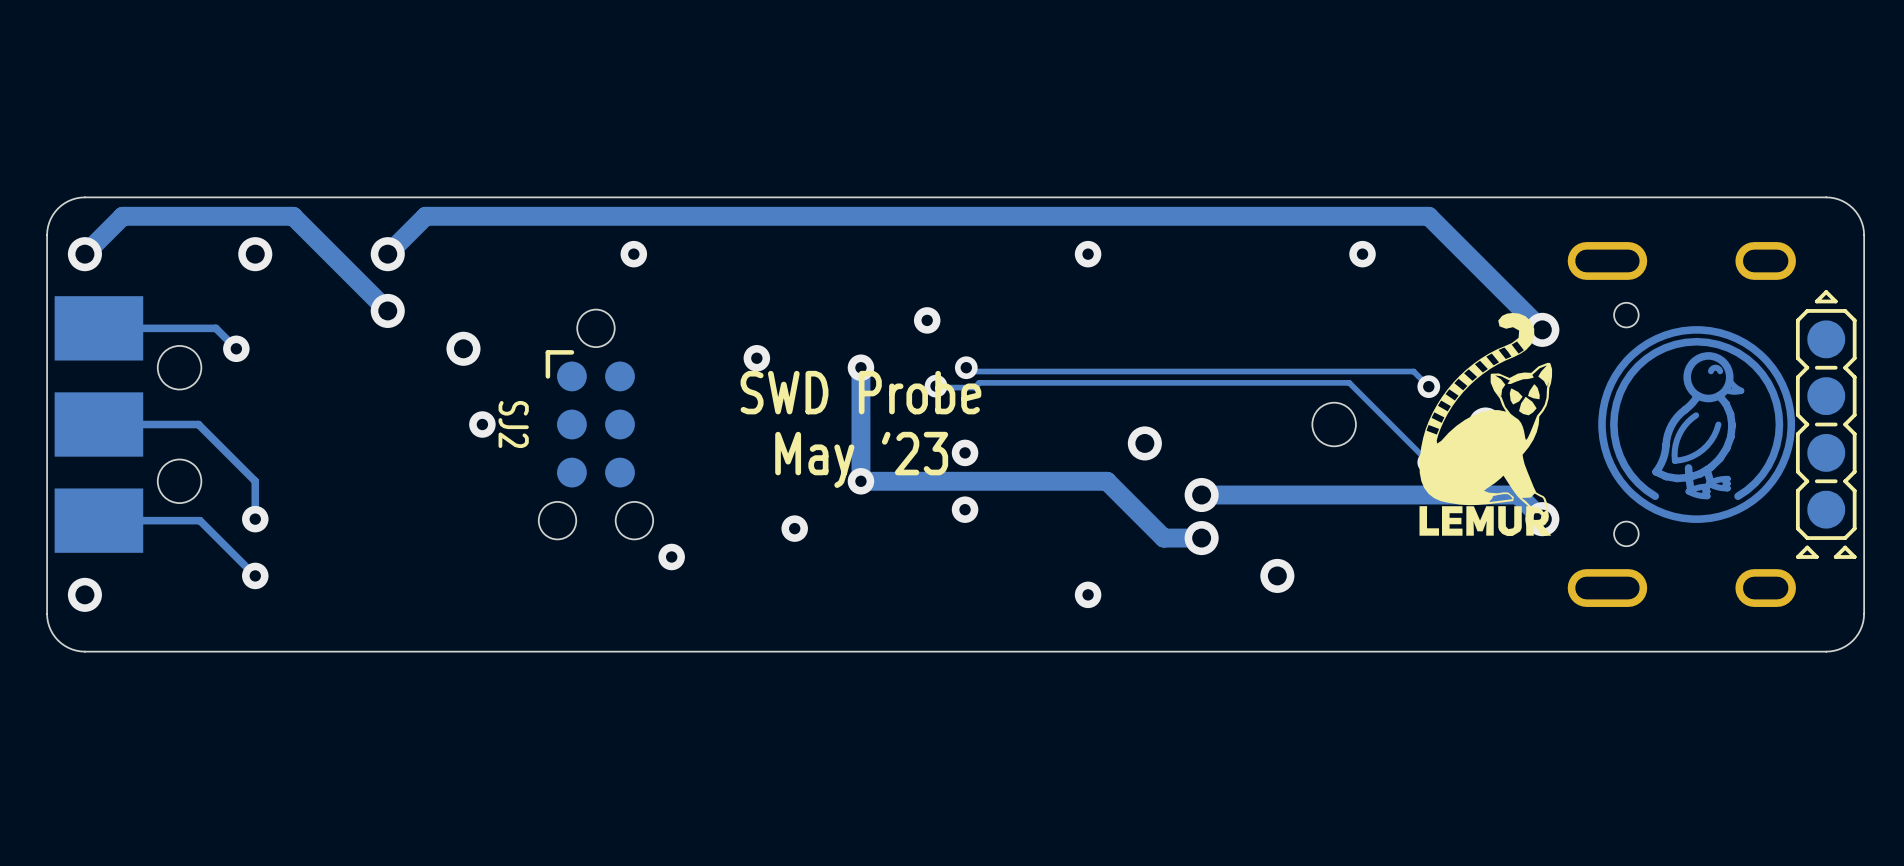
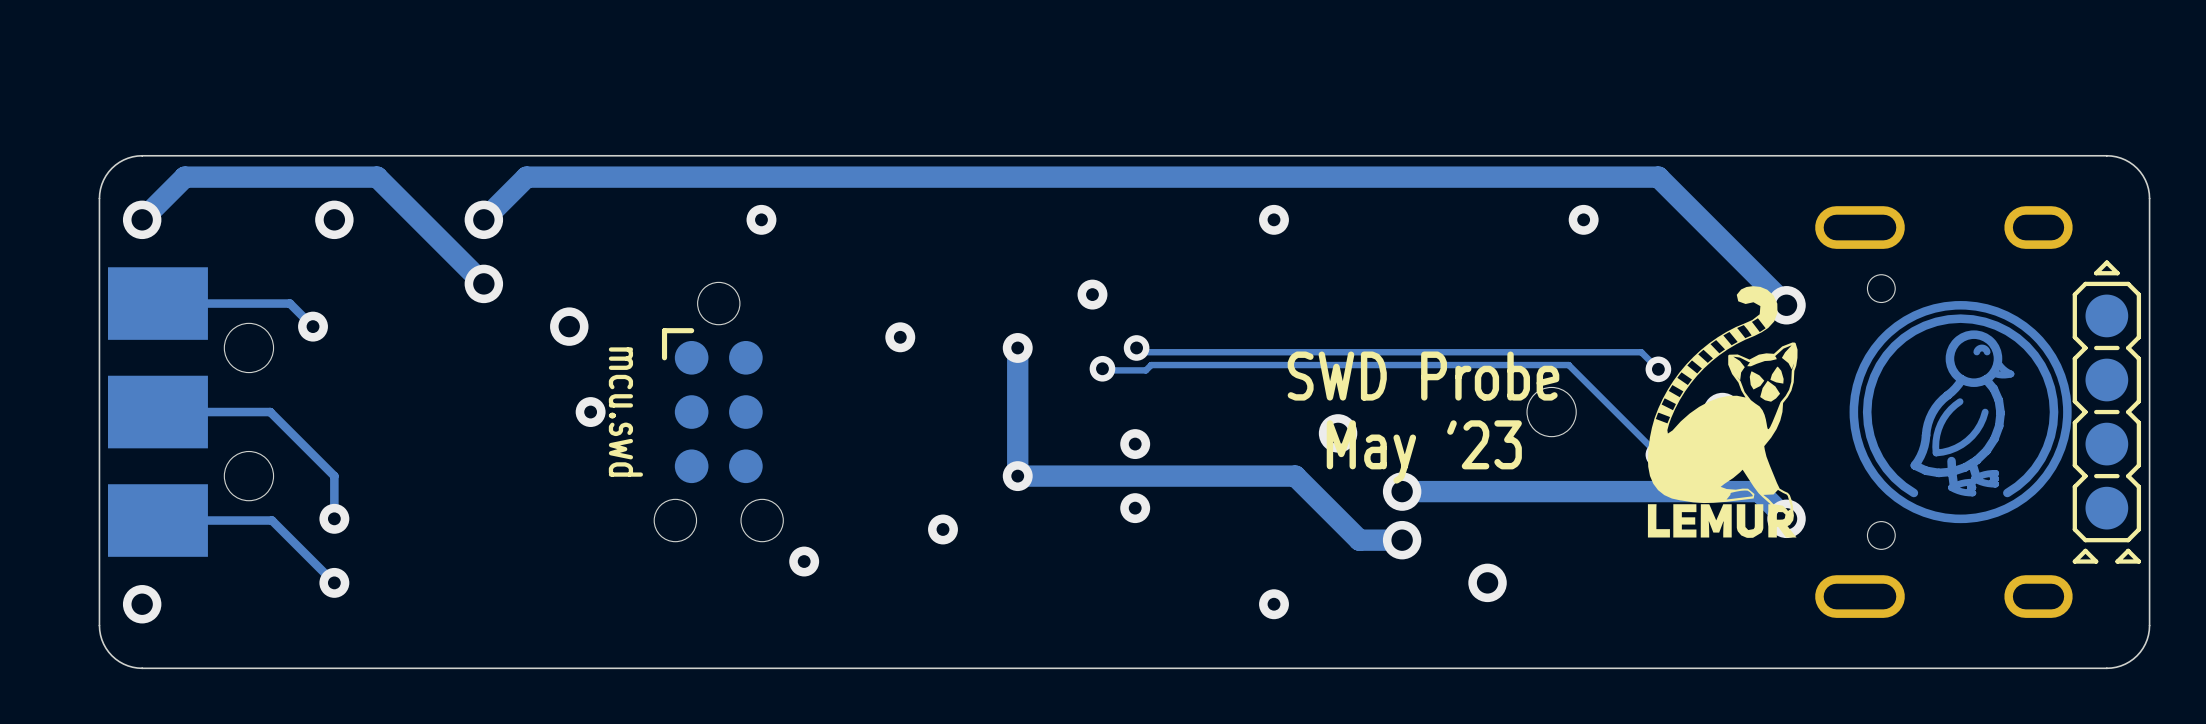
text position: SWD Probe (860, 392) -> SWD Probe (1423, 376)
SJ2 name: SJ2 (513, 424) -> mcu.swd (625, 412)
text position: May '23 (861, 459) -> May '23 (1424, 451)

